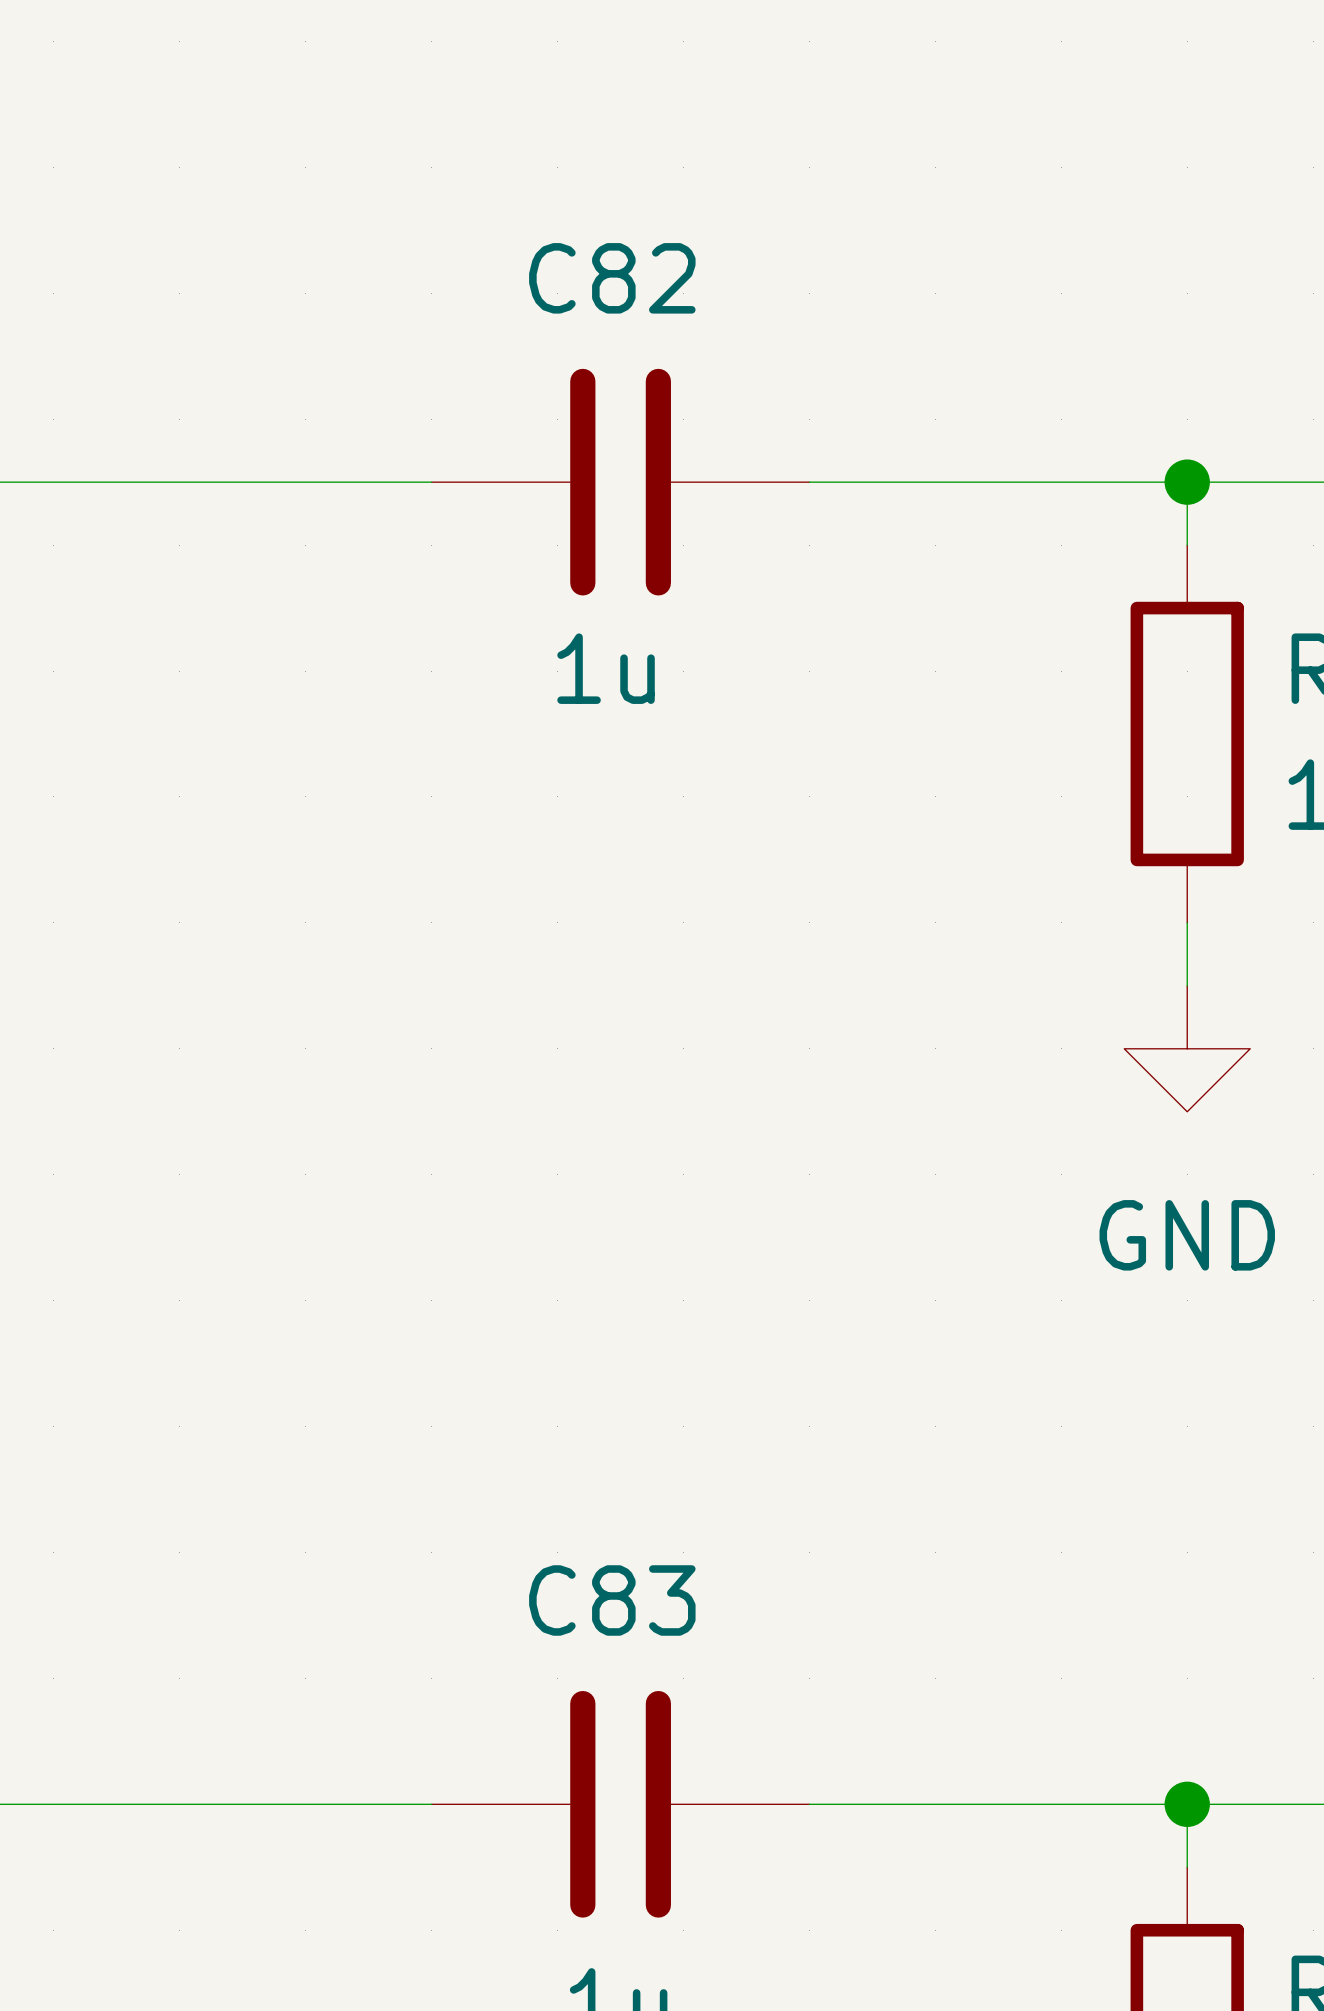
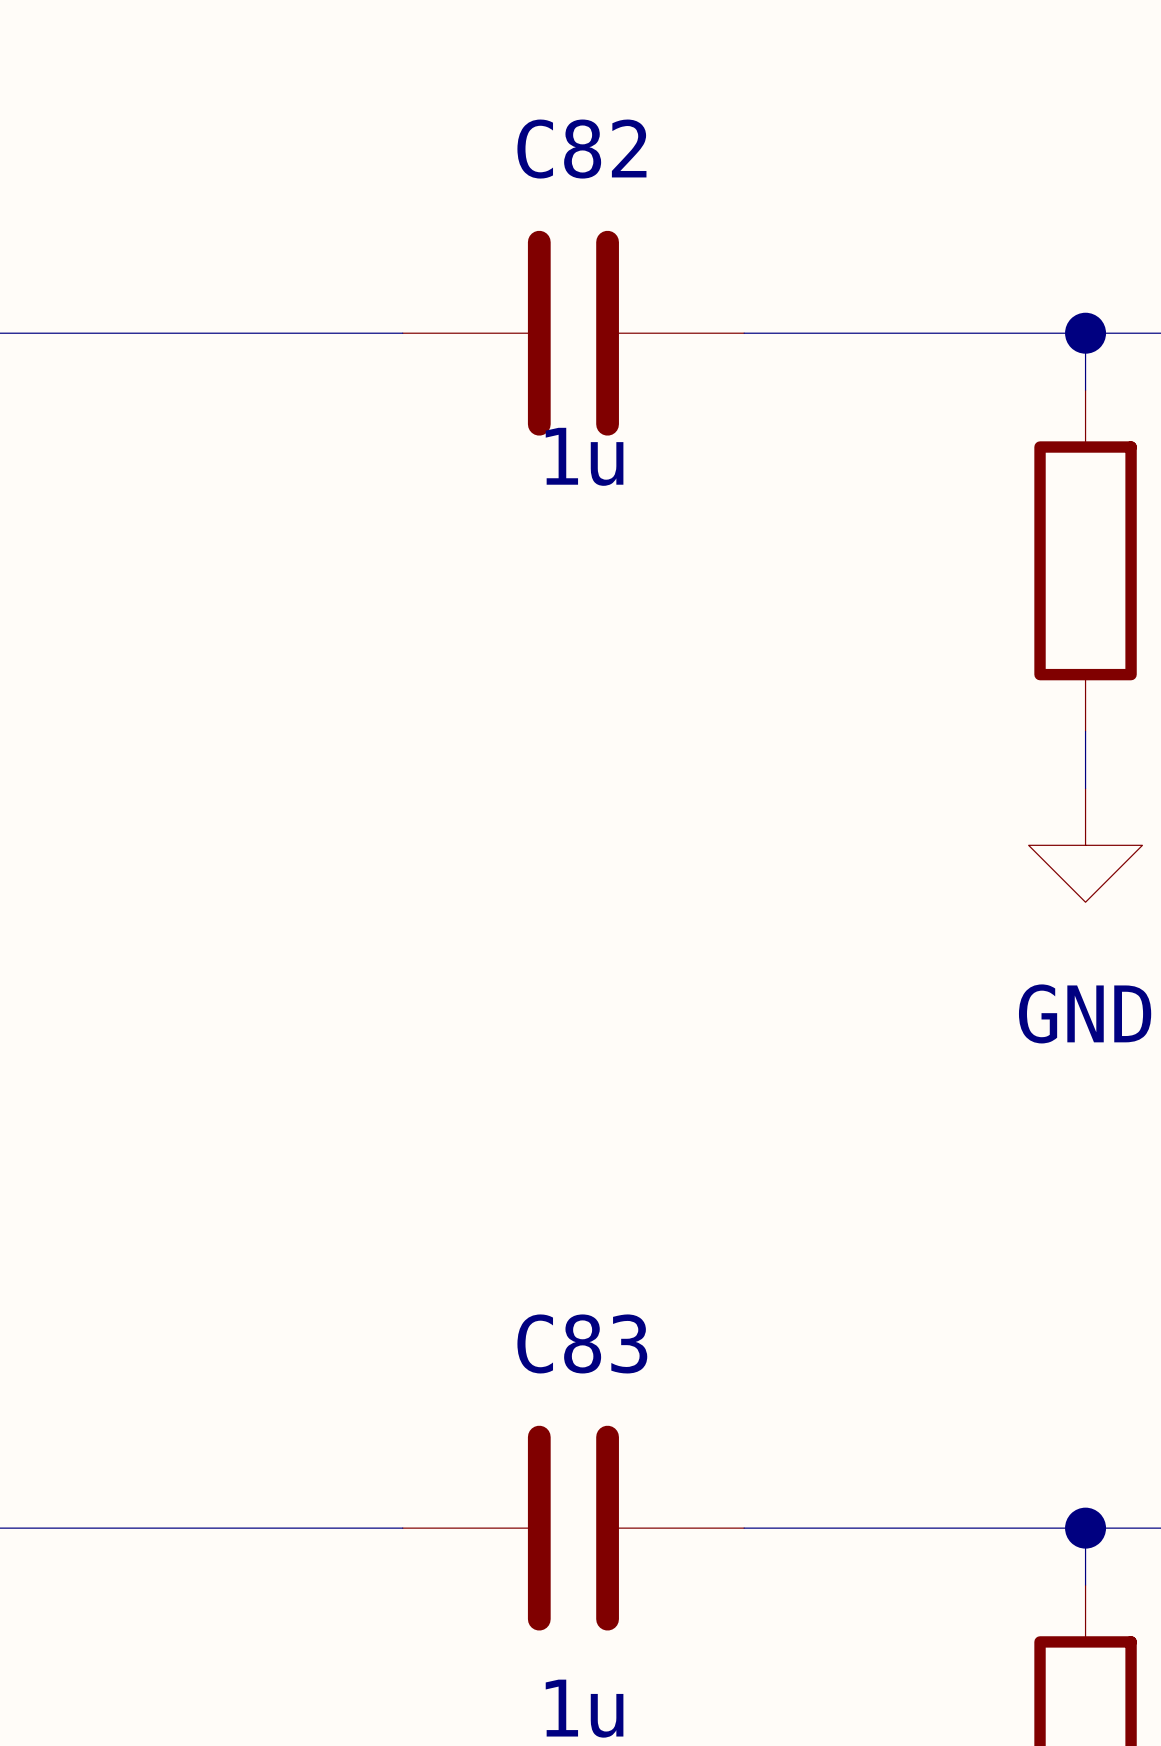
C82 value position: 1u (606, 668) -> 1u (584, 456)

